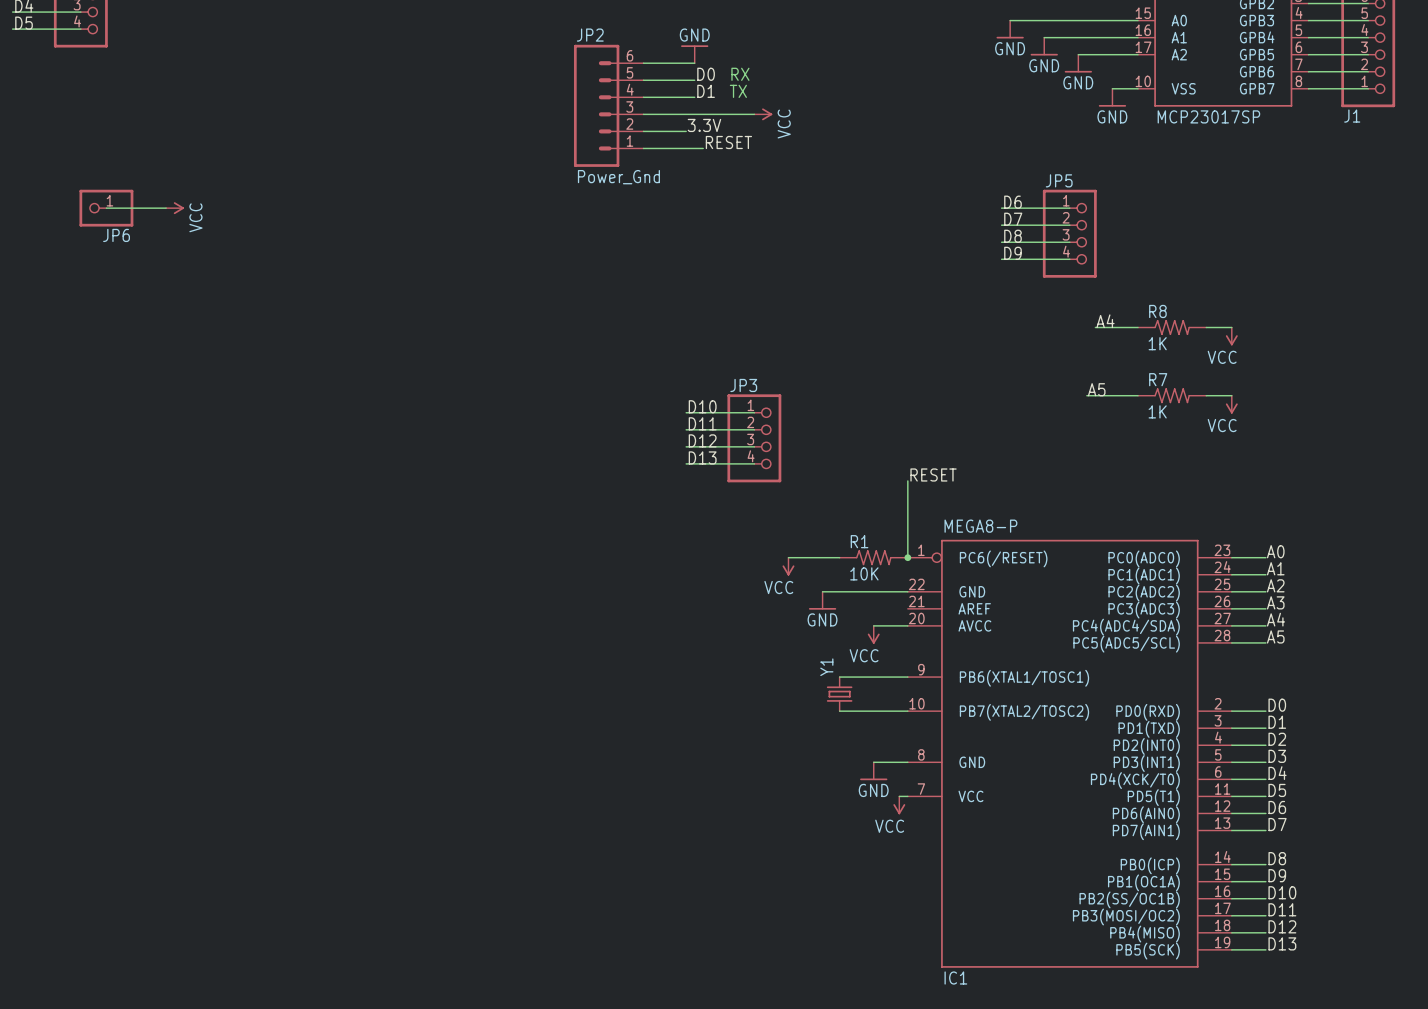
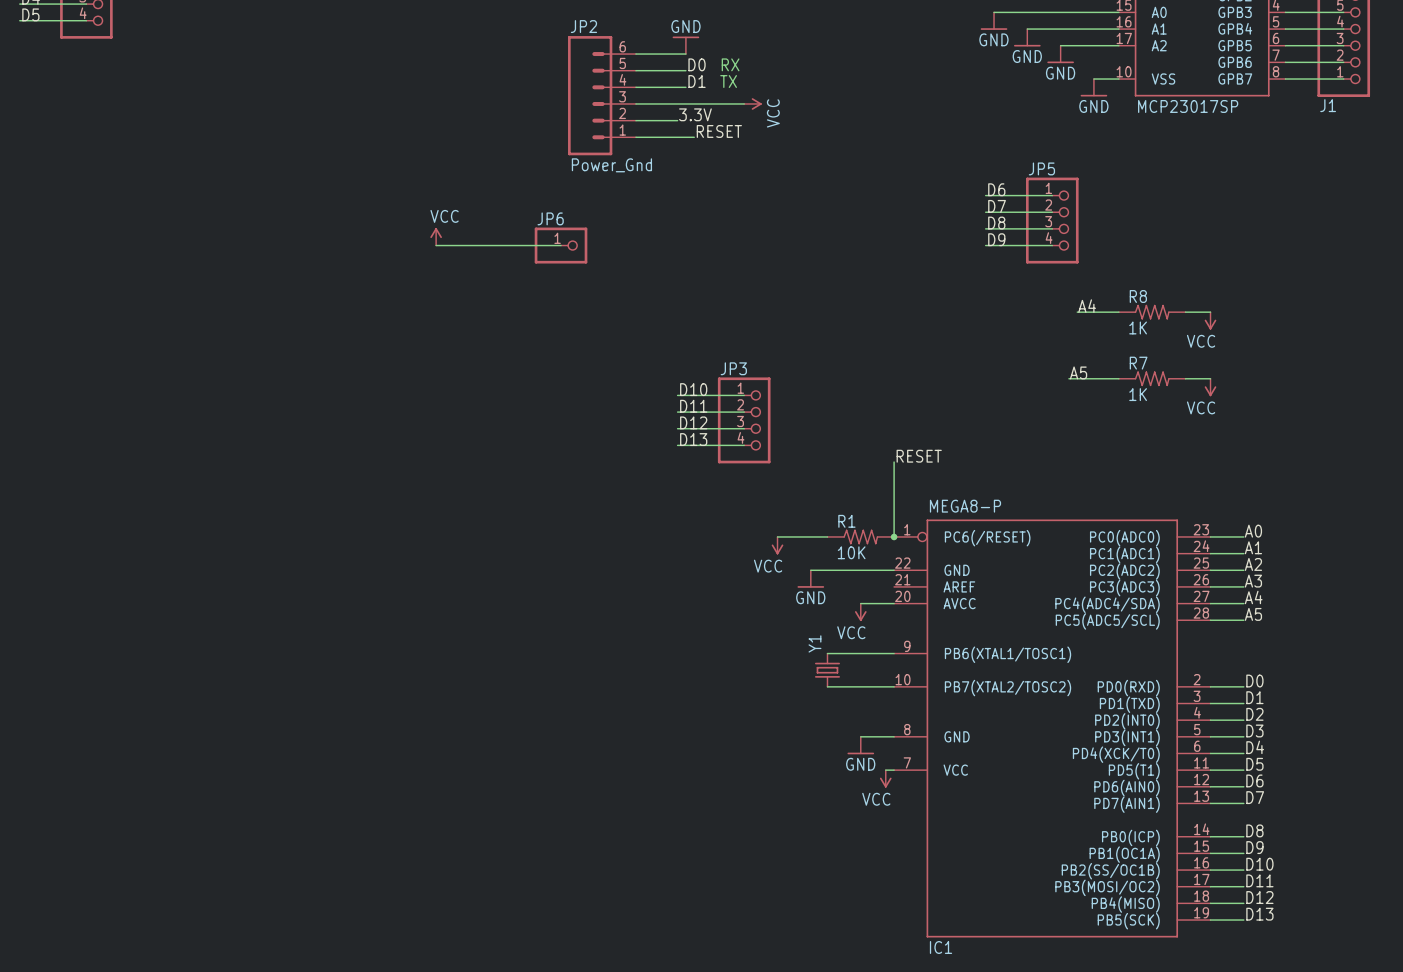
wire: (106, 208) (166, 208) -> none
JP6 rotation: 0° (106, 208) -> 180° (561, 245)
JP6 position: (106, 208) -> (561, 245)
power symbol: VCC (175, 208) -> none
power symbol: none -> VCC (436, 236)
wire: none -> (436, 245) (561, 245)

